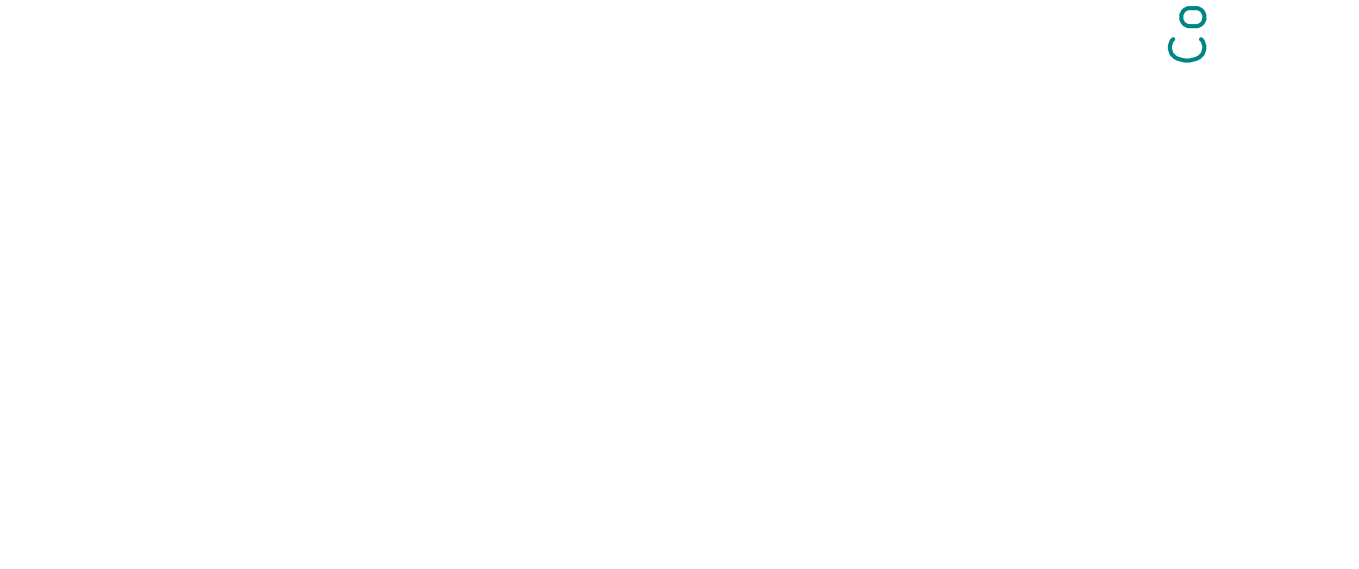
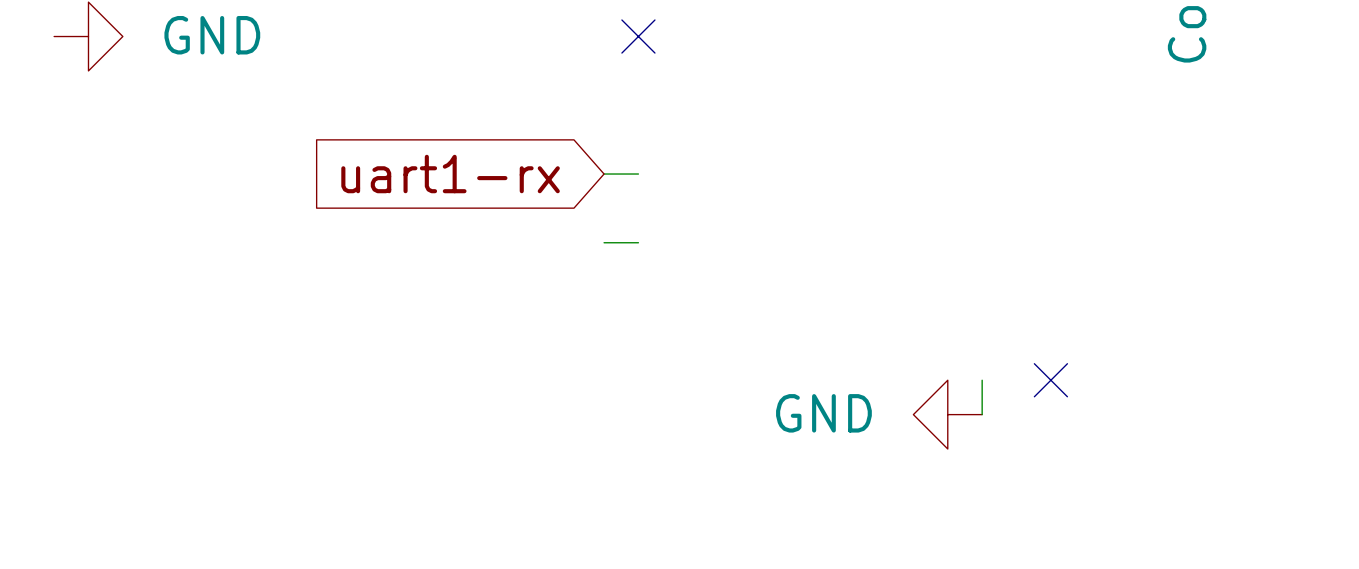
power symbol: none -> GND (88, 36)
no-connect mark: none -> (638, 36)
global label: none -> uart1-rx (450, 174)
wire: none -> (604, 174) (638, 174)
wire: none -> (604, 242) (638, 242)
wire: none -> (982, 380) (982, 414)
no-connect mark: none -> (1050, 380)
power symbol: none -> GND (947, 414)

